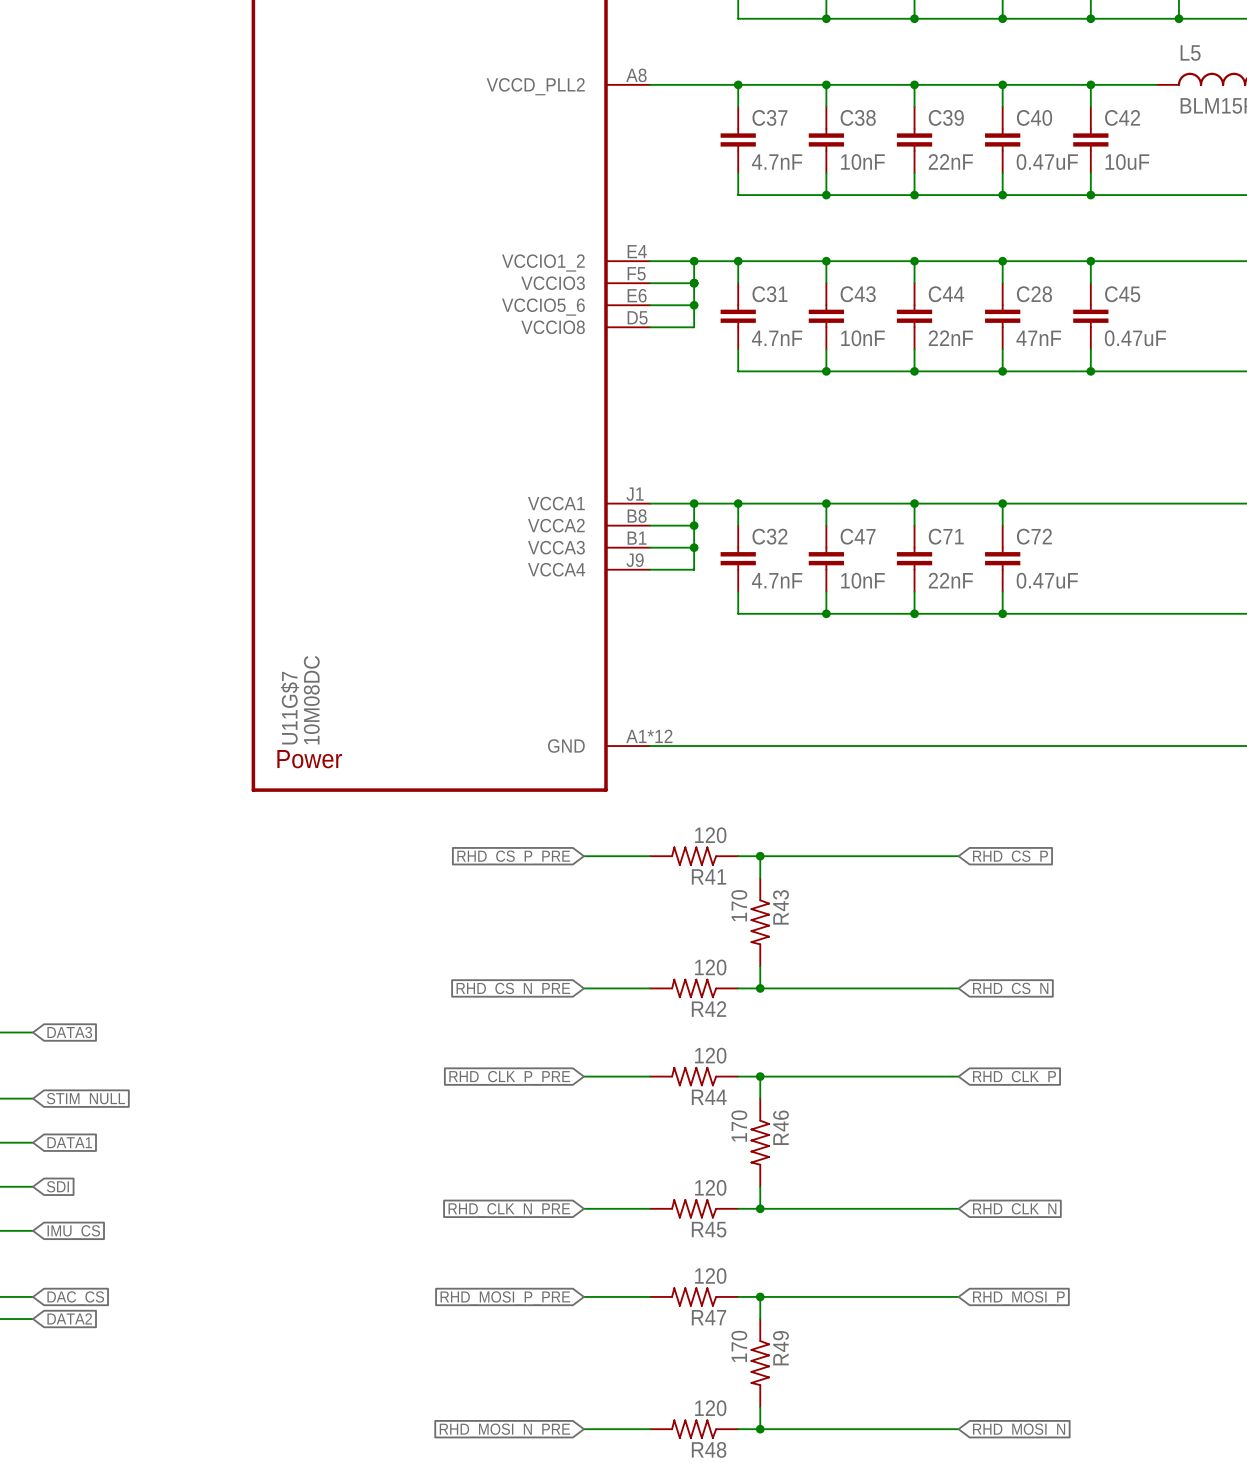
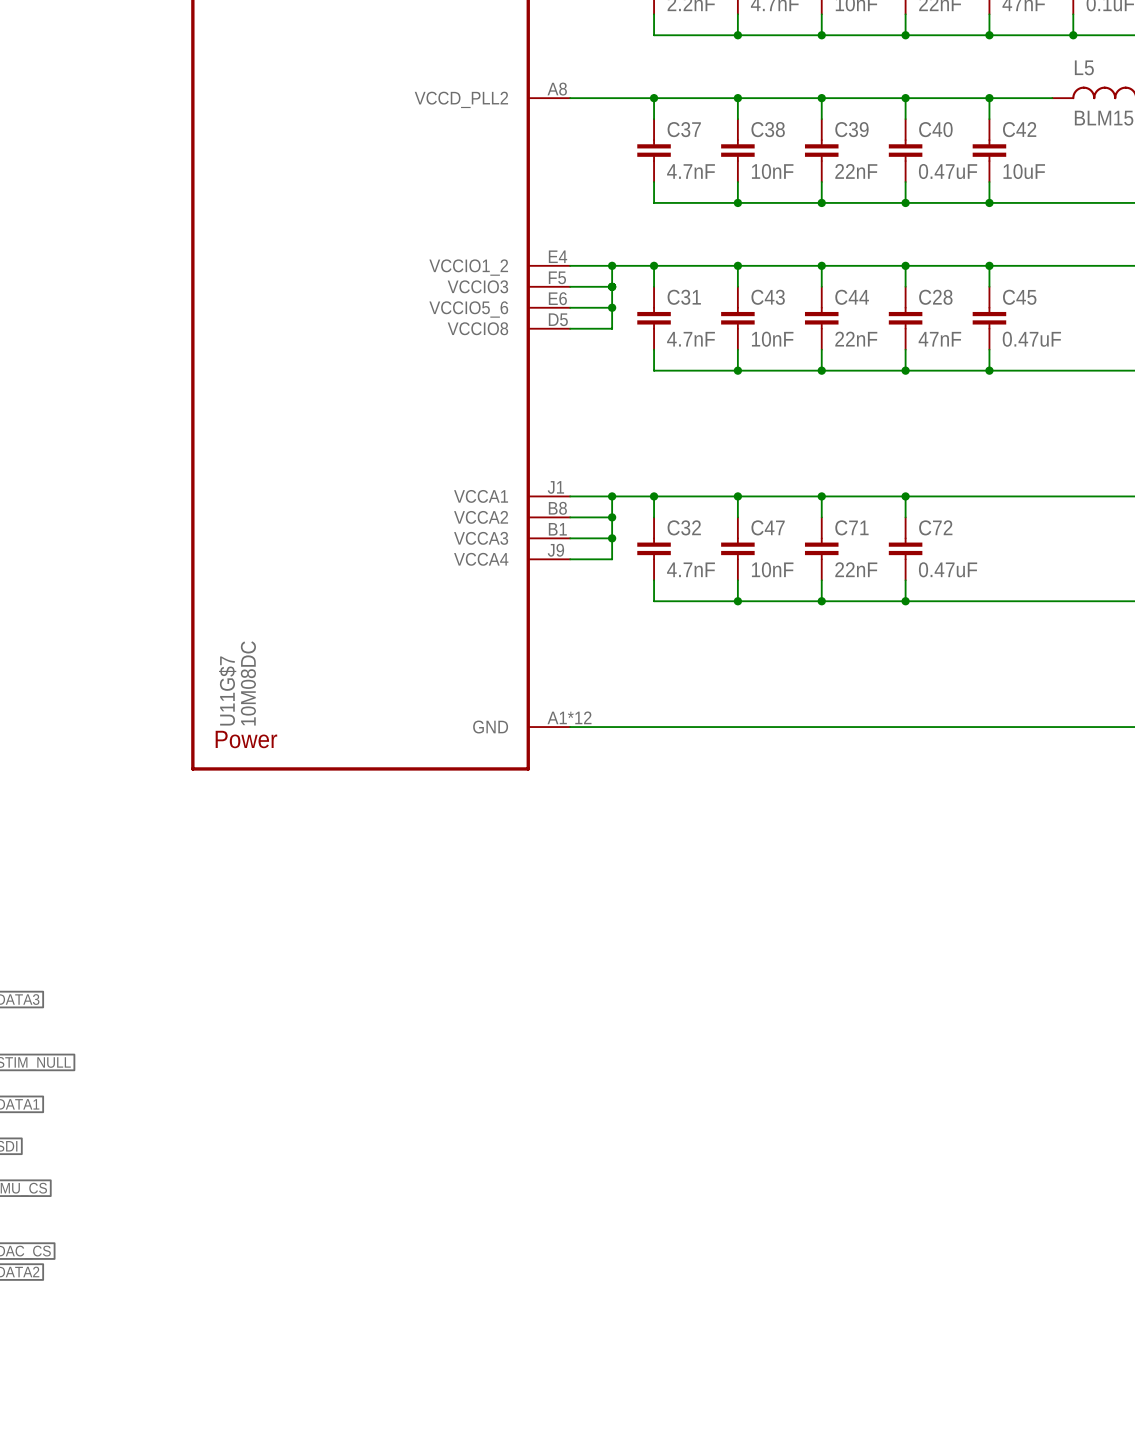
wire: (583, 856) (650, 856) -> none
R41: 120 (694, 856) -> none
wire: (738, 856) (958, 856) -> none
wire: (760, 856) (760, 878) -> none
junction: (760, 856) -> none
global label: RHD_CS_P_PRE (513, 857) -> none
global label: RHD_CS_P (1010, 857) -> none
R43: 170 (760, 922) -> none
wire: (760, 966) (760, 988) -> none
wire: (583, 988) (650, 988) -> none
R42: 120 (694, 988) -> none
wire: (738, 988) (958, 988) -> none
junction: (760, 988) -> none
global label: RHD_CS_N_PRE (513, 989) -> none
global label: RHD_CS_N (1010, 989) -> none
wire: (583, 1076) (650, 1076) -> none
R44: 120 (694, 1076) -> none
wire: (738, 1076) (958, 1076) -> none
wire: (760, 1076) (760, 1098) -> none
junction: (760, 1076) -> none
global label: RHD_CLK_P_PRE (509, 1078) -> none
global label: RHD_CLK_P (1014, 1078) -> none
R46: 170 (760, 1142) -> none
wire: (760, 1186) (760, 1208) -> none
wire: (583, 1208) (650, 1208) -> none
R45: 120 (694, 1208) -> none
wire: (738, 1208) (958, 1208) -> none
junction: (760, 1208) -> none
global label: RHD_CLK_N_PRE (509, 1210) -> none
global label: RHD_CLK_N (1014, 1210) -> none
wire: (583, 1296) (650, 1296) -> none
R47: 120 (694, 1296) -> none
wire: (738, 1296) (958, 1296) -> none
wire: (760, 1296) (760, 1319) -> none
junction: (760, 1296) -> none
global label: RHD_MOSI_P_PRE (505, 1298) -> none
global label: RHD_MOSI_P (1018, 1298) -> none
R49: 170 (760, 1363) -> none
wire: (760, 1407) (760, 1429) -> none
wire: (583, 1429) (650, 1429) -> none
R48: 120 (694, 1429) -> none
wire: (738, 1429) (958, 1429) -> none
junction: (760, 1429) -> none
global label: RHD_MOSI_N_PRE (504, 1430) -> none
global label: RHD_MOSI_N (1019, 1430) -> none

